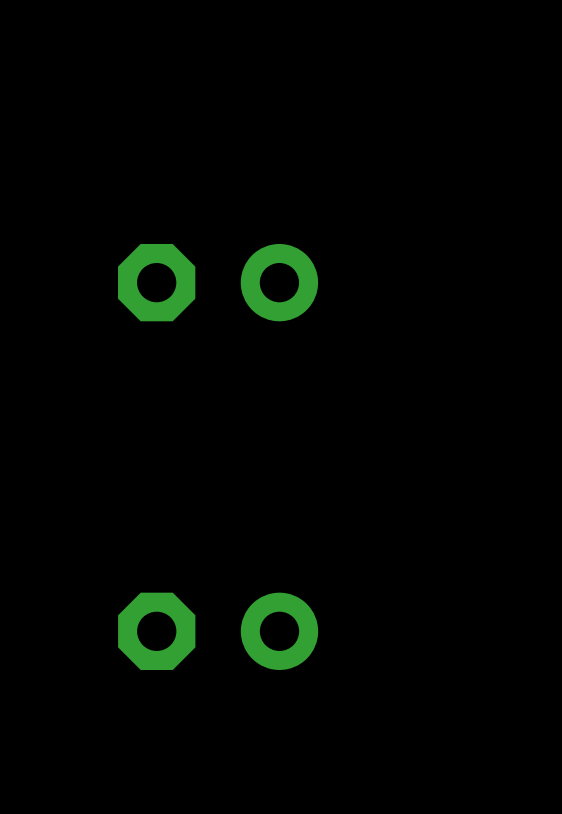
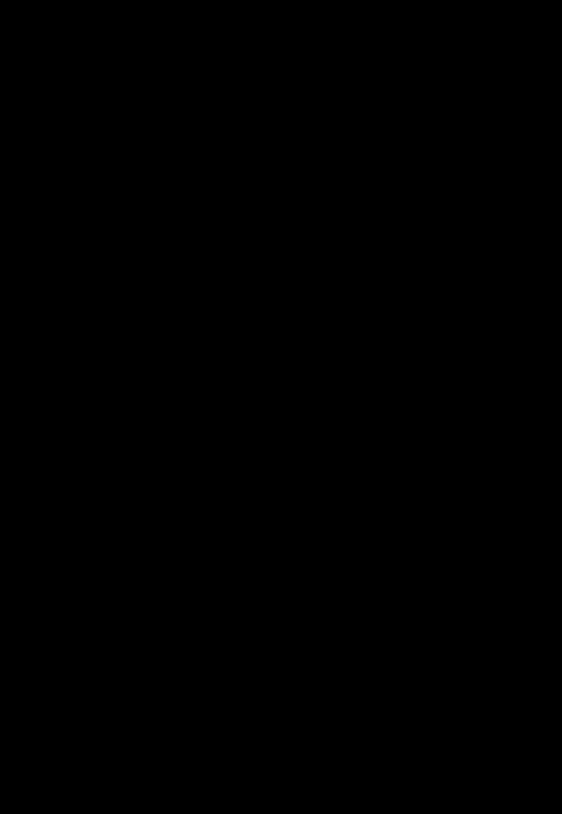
part: (218, 282) -> none
part: (218, 631) -> none

